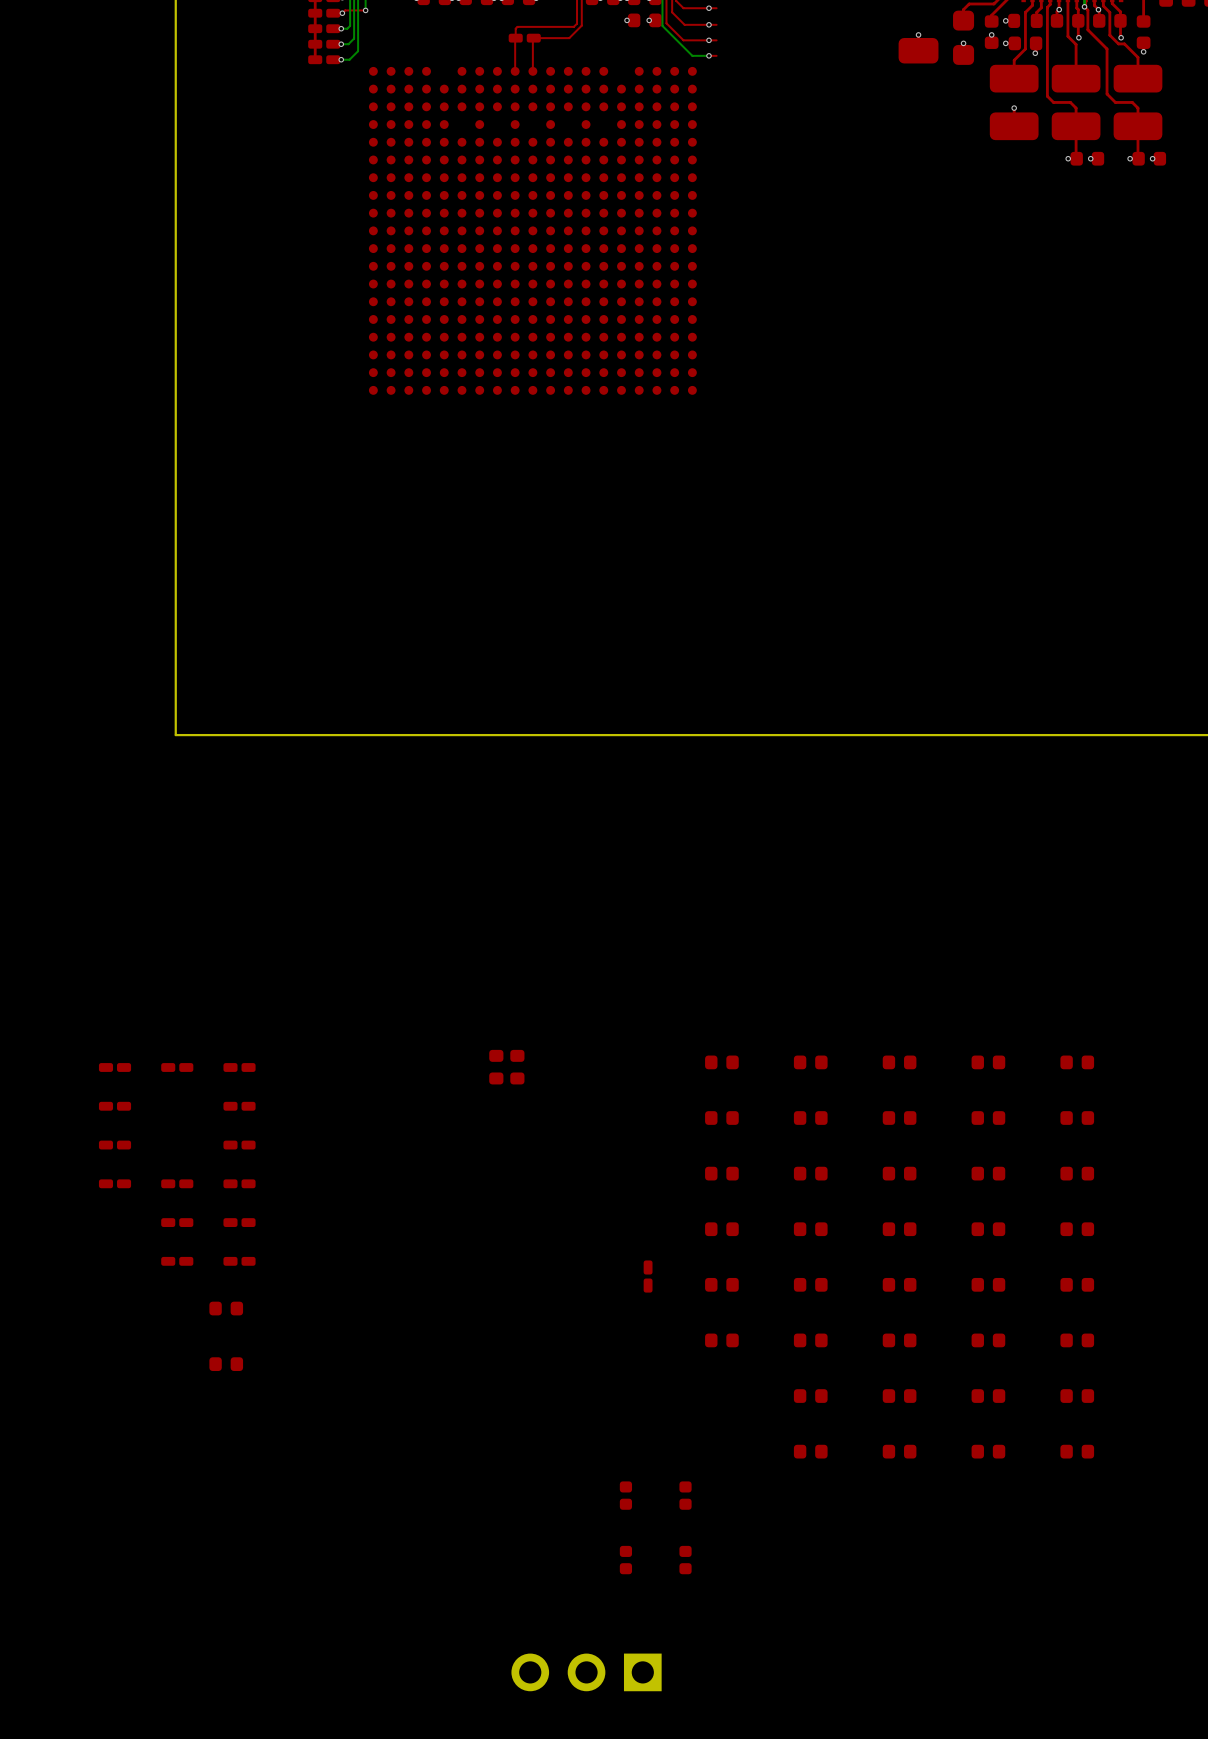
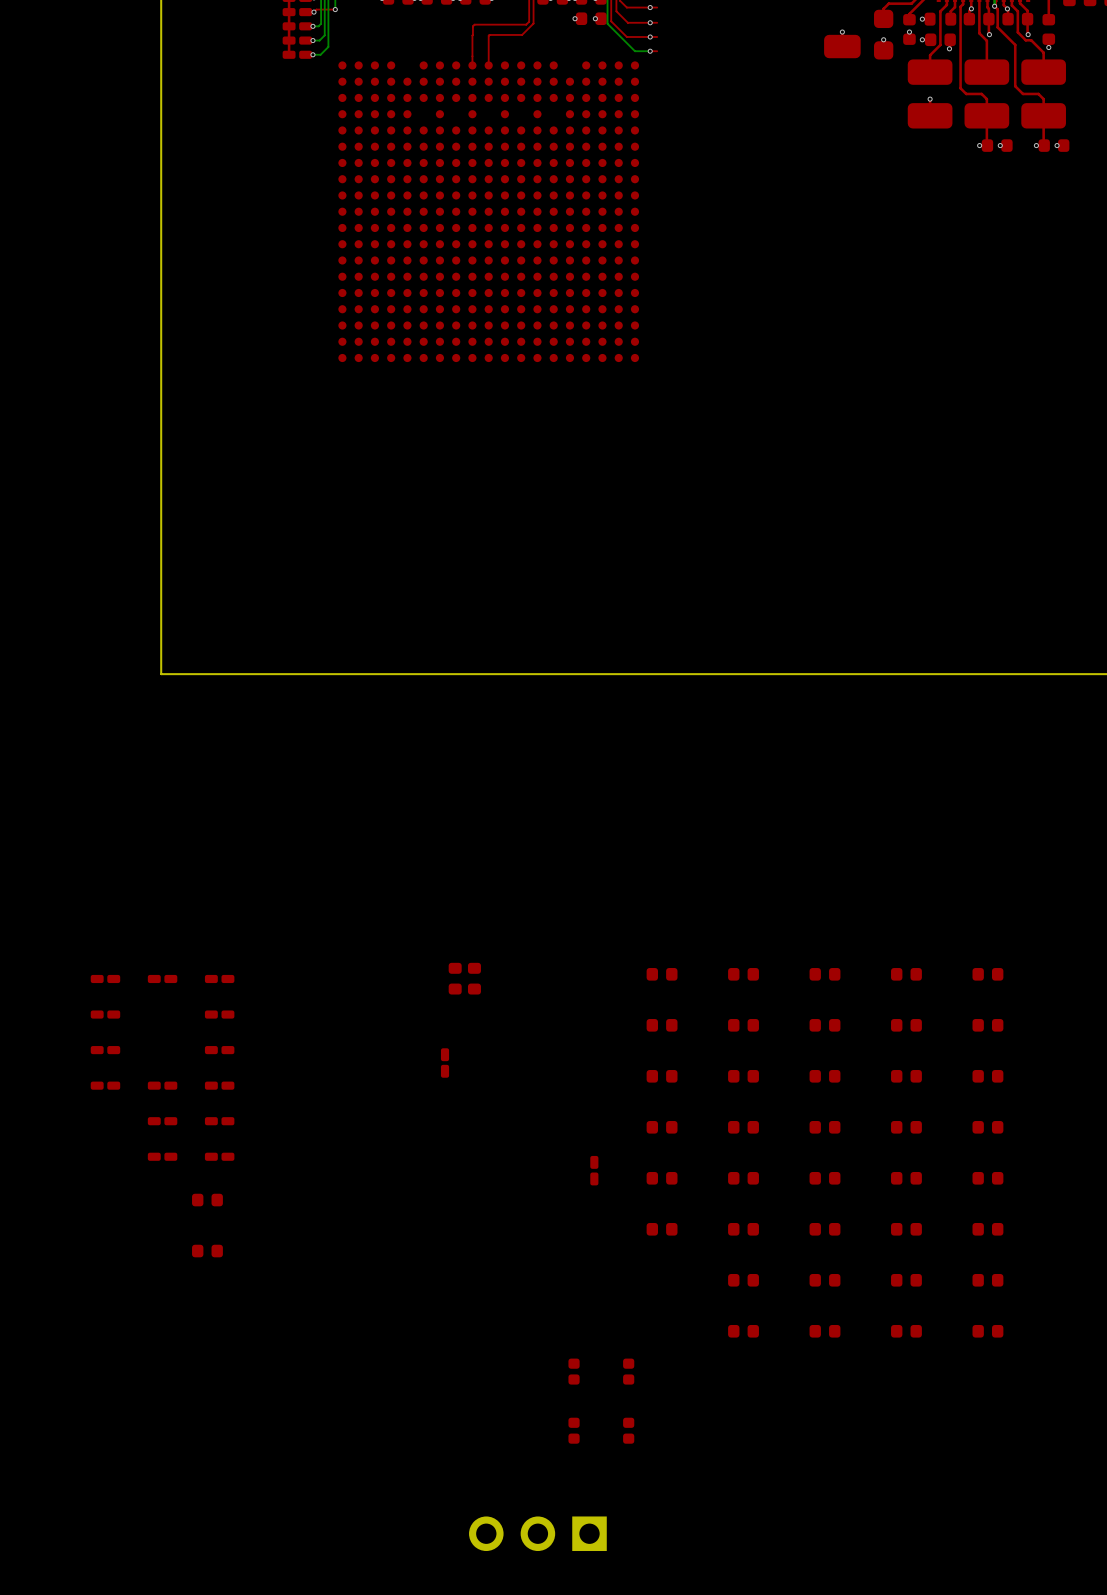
part: (524, 38) -> none
part: none -> (445, 1063)

